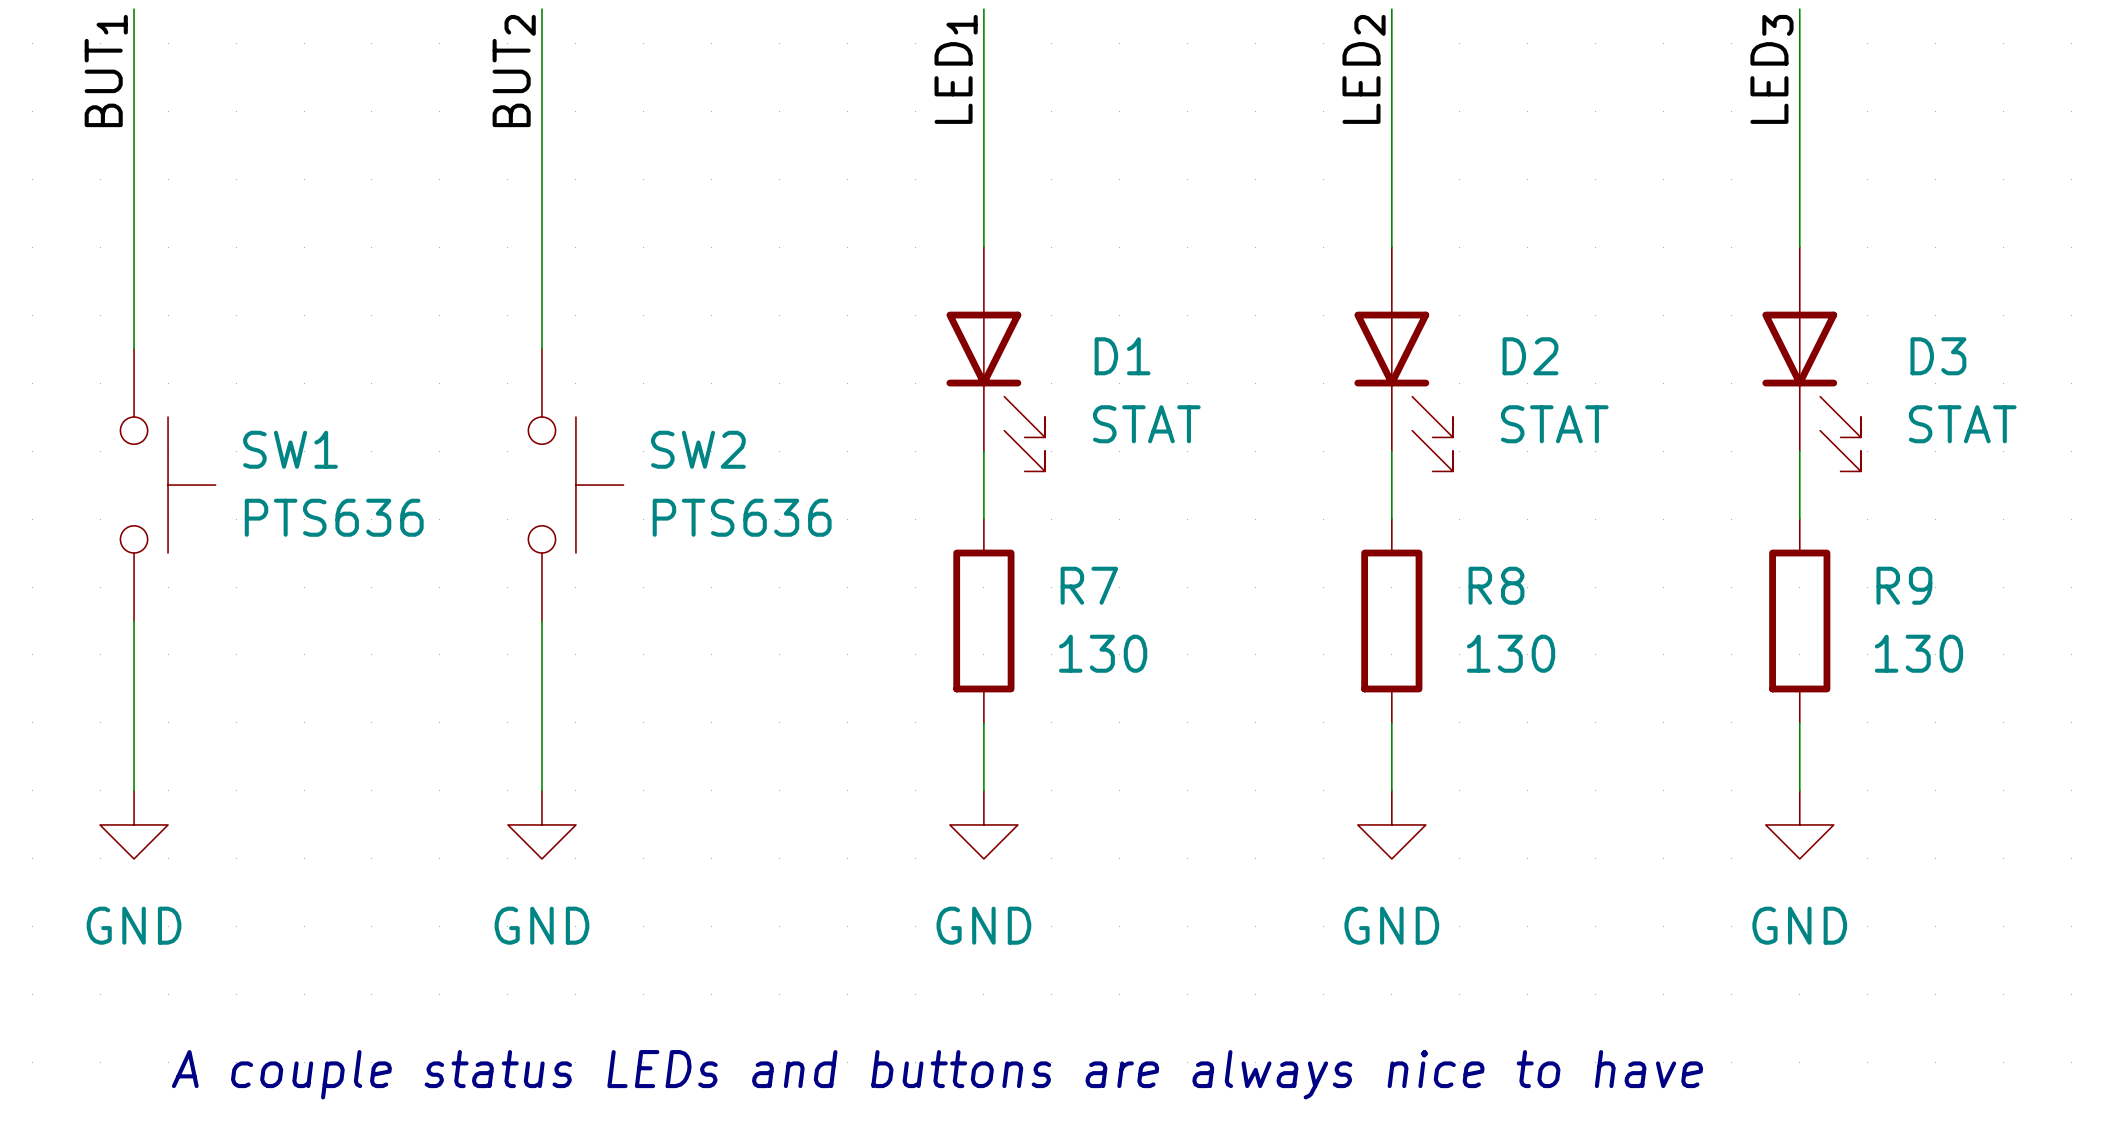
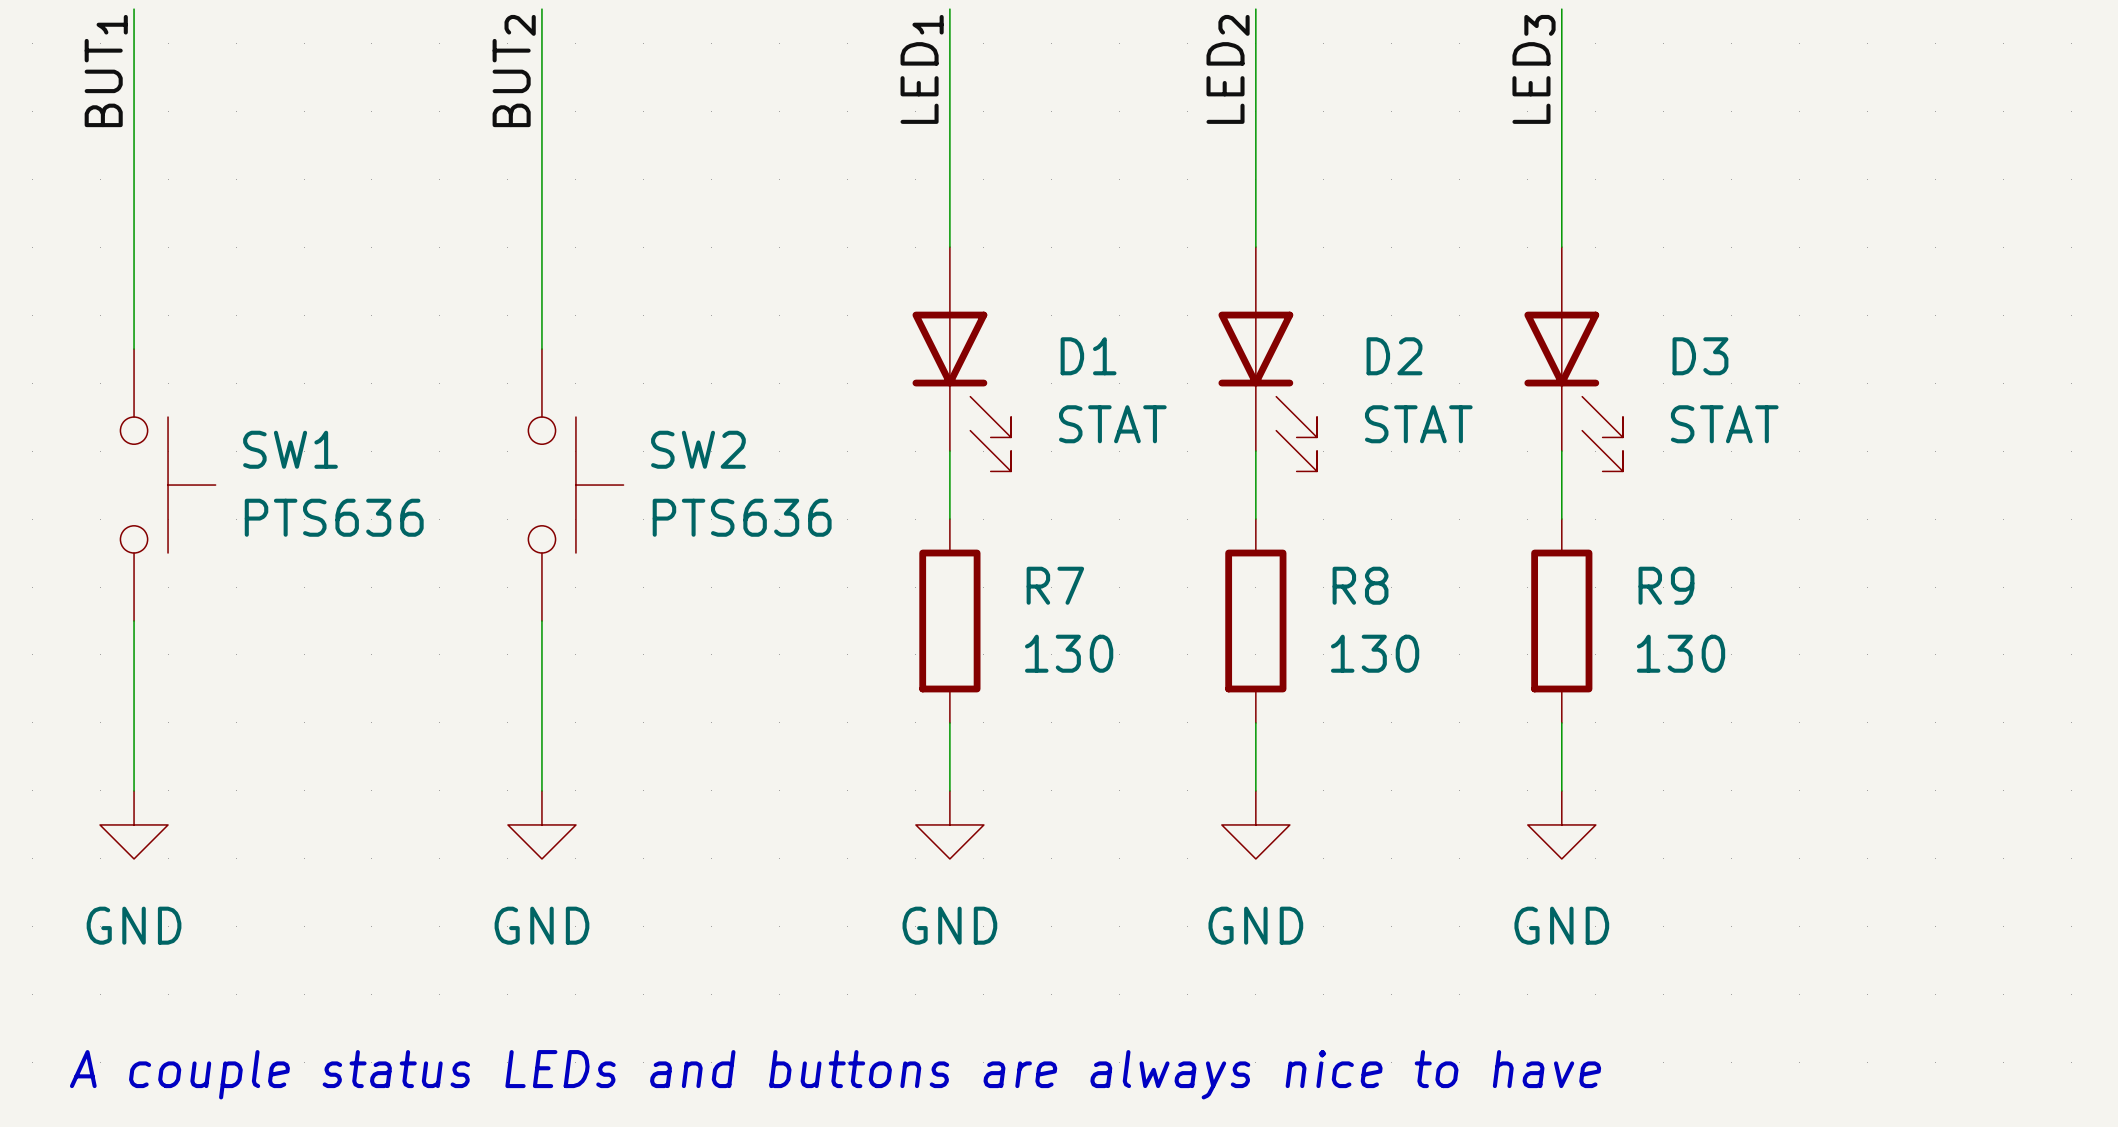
wire: (983, 9) (983, 247) -> (949, 9) (949, 247)
wire: (1391, 9) (1391, 247) -> (1255, 9) (1255, 247)
wire: (1799, 9) (1799, 247) -> (1561, 9) (1561, 247)
label position: LED1 (956, 69) -> LED1 (922, 69)
label position: LED2 (1364, 69) -> LED2 (1228, 69)
label position: LED3 (1771, 69) -> LED3 (1534, 69)
D1 position: (995, 359) -> (961, 359)
D2 position: (1403, 359) -> (1267, 359)
D3 position: (1811, 359) -> (1573, 359)
wire: (983, 451) (983, 519) -> (949, 451) (949, 519)
wire: (1391, 451) (1391, 519) -> (1255, 451) (1255, 519)
wire: (1799, 451) (1799, 519) -> (1561, 451) (1561, 519)
R7 position: (983, 621) -> (949, 621)
R8 position: (1391, 621) -> (1255, 621)
R9 position: (1799, 621) -> (1561, 621)
wire: (983, 722) (983, 790) -> (949, 722) (949, 790)
wire: (1391, 722) (1391, 790) -> (1255, 722) (1255, 790)
wire: (1799, 722) (1799, 790) -> (1561, 722) (1561, 790)
power symbol position: GND (983, 824) -> GND (949, 824)
power symbol: none -> GND (1255, 824)
power symbol: GND (1391, 824) -> none
power symbol: none -> GND (1561, 824)
power symbol: GND (1799, 824) -> none
text position: A couple status LEDs and buttons are always nice to have (937, 1074) -> A couple status LEDs and buttons are always nice to have (835, 1074)

